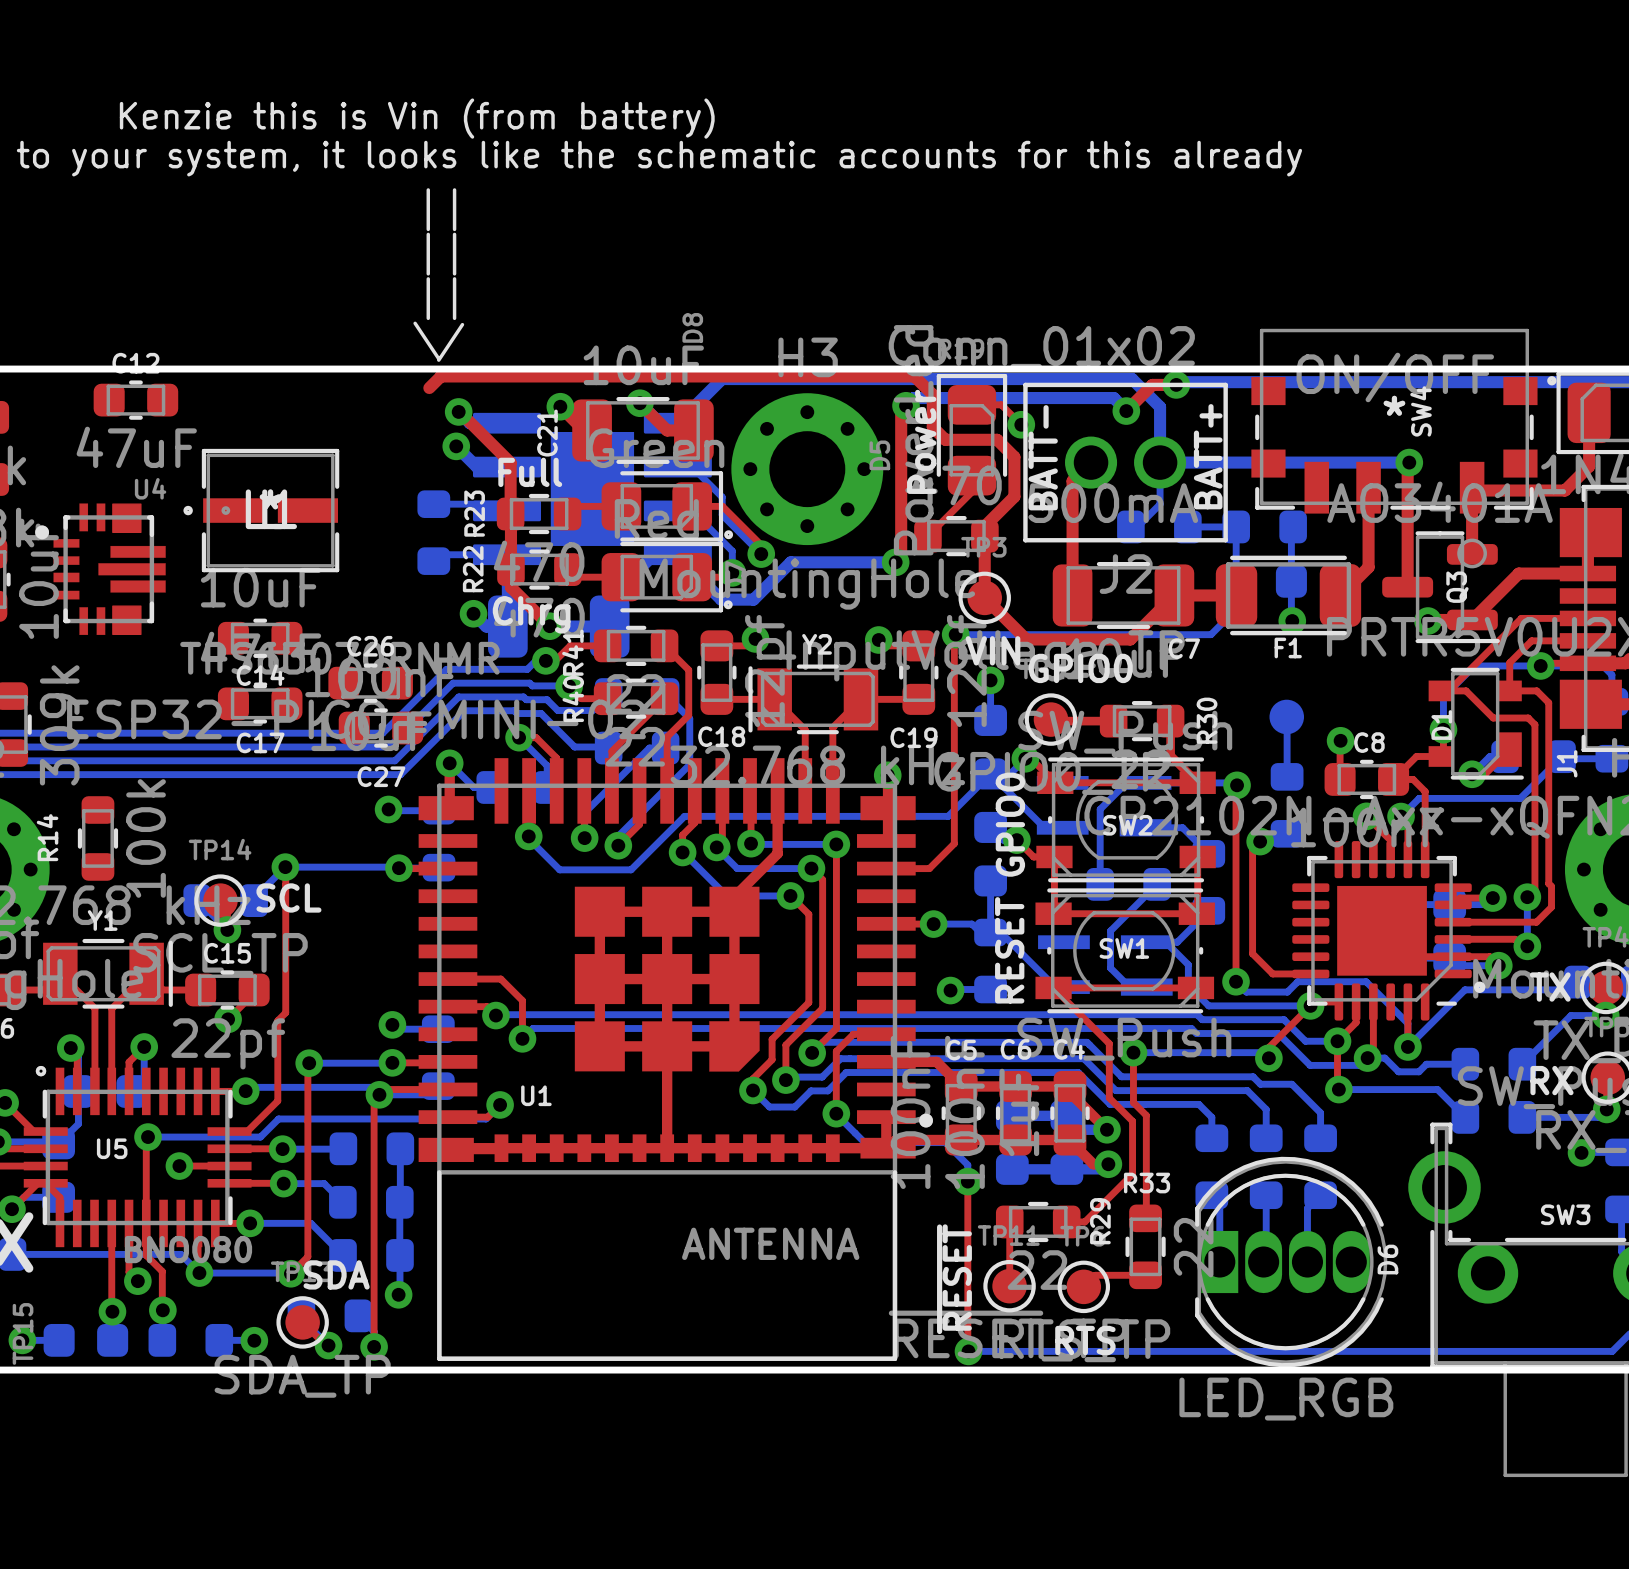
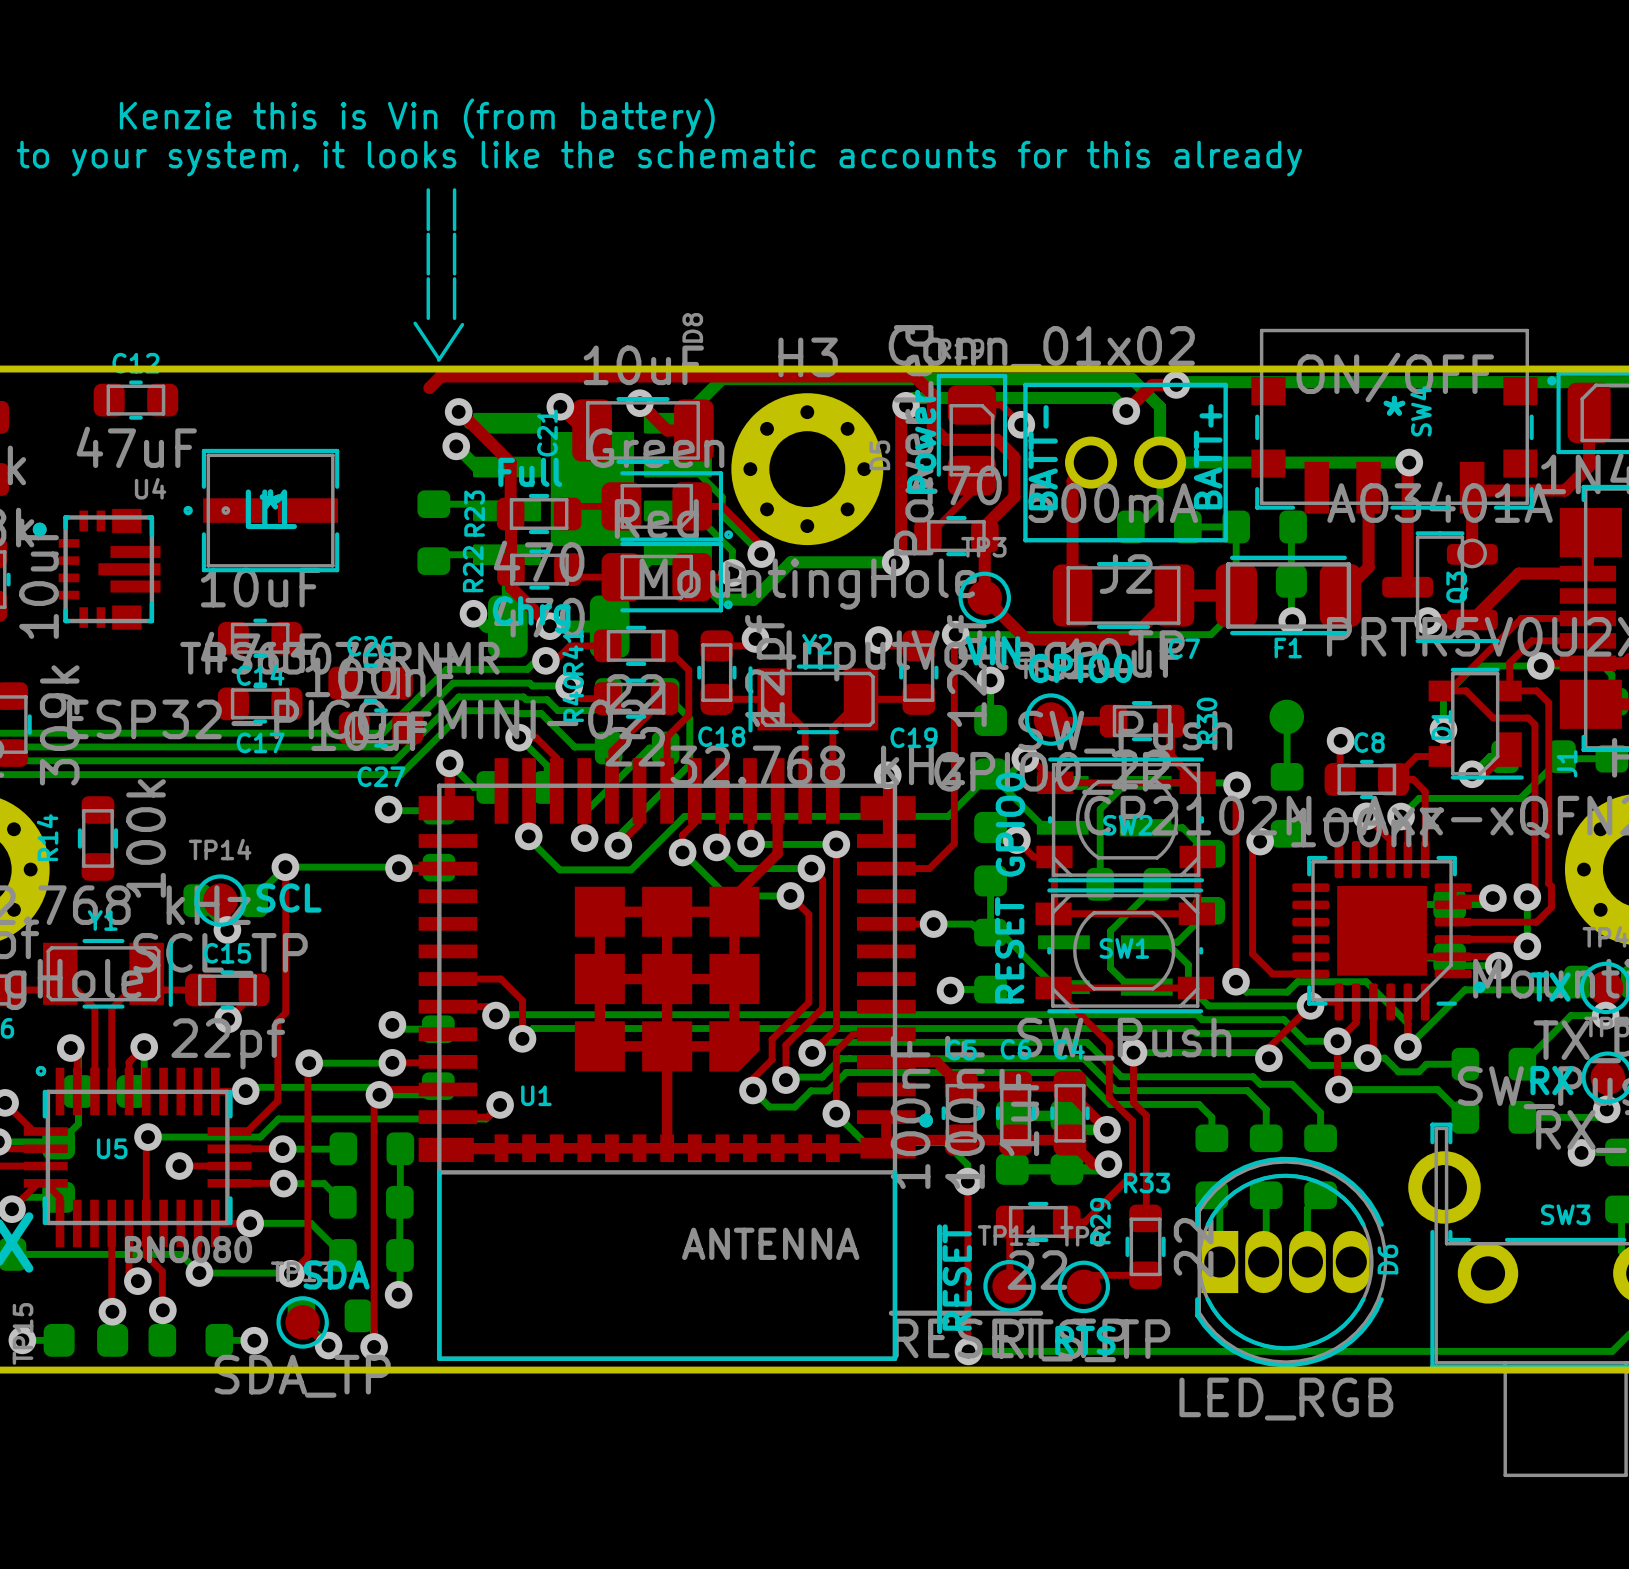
U4 footprint: [35, 503, 166, 635] -> [32, 508, 161, 630]

